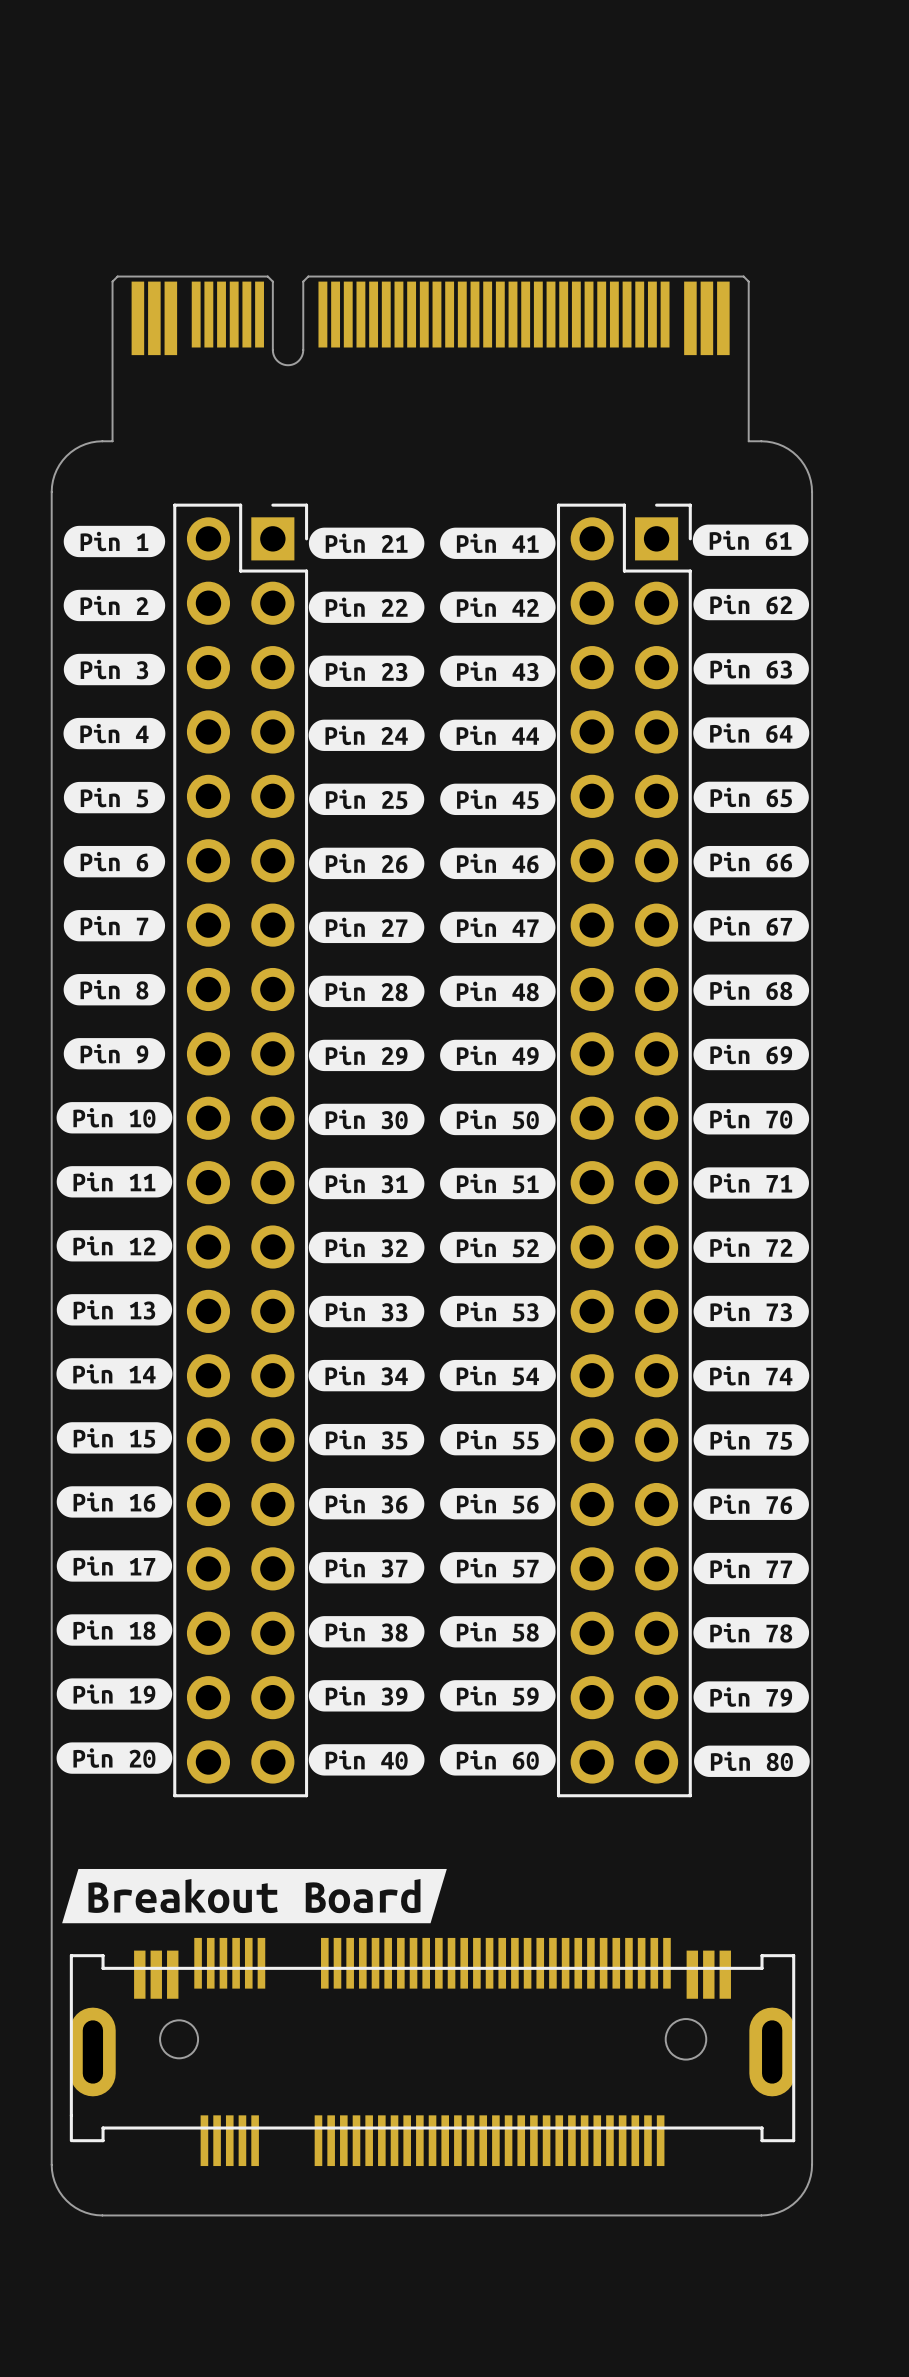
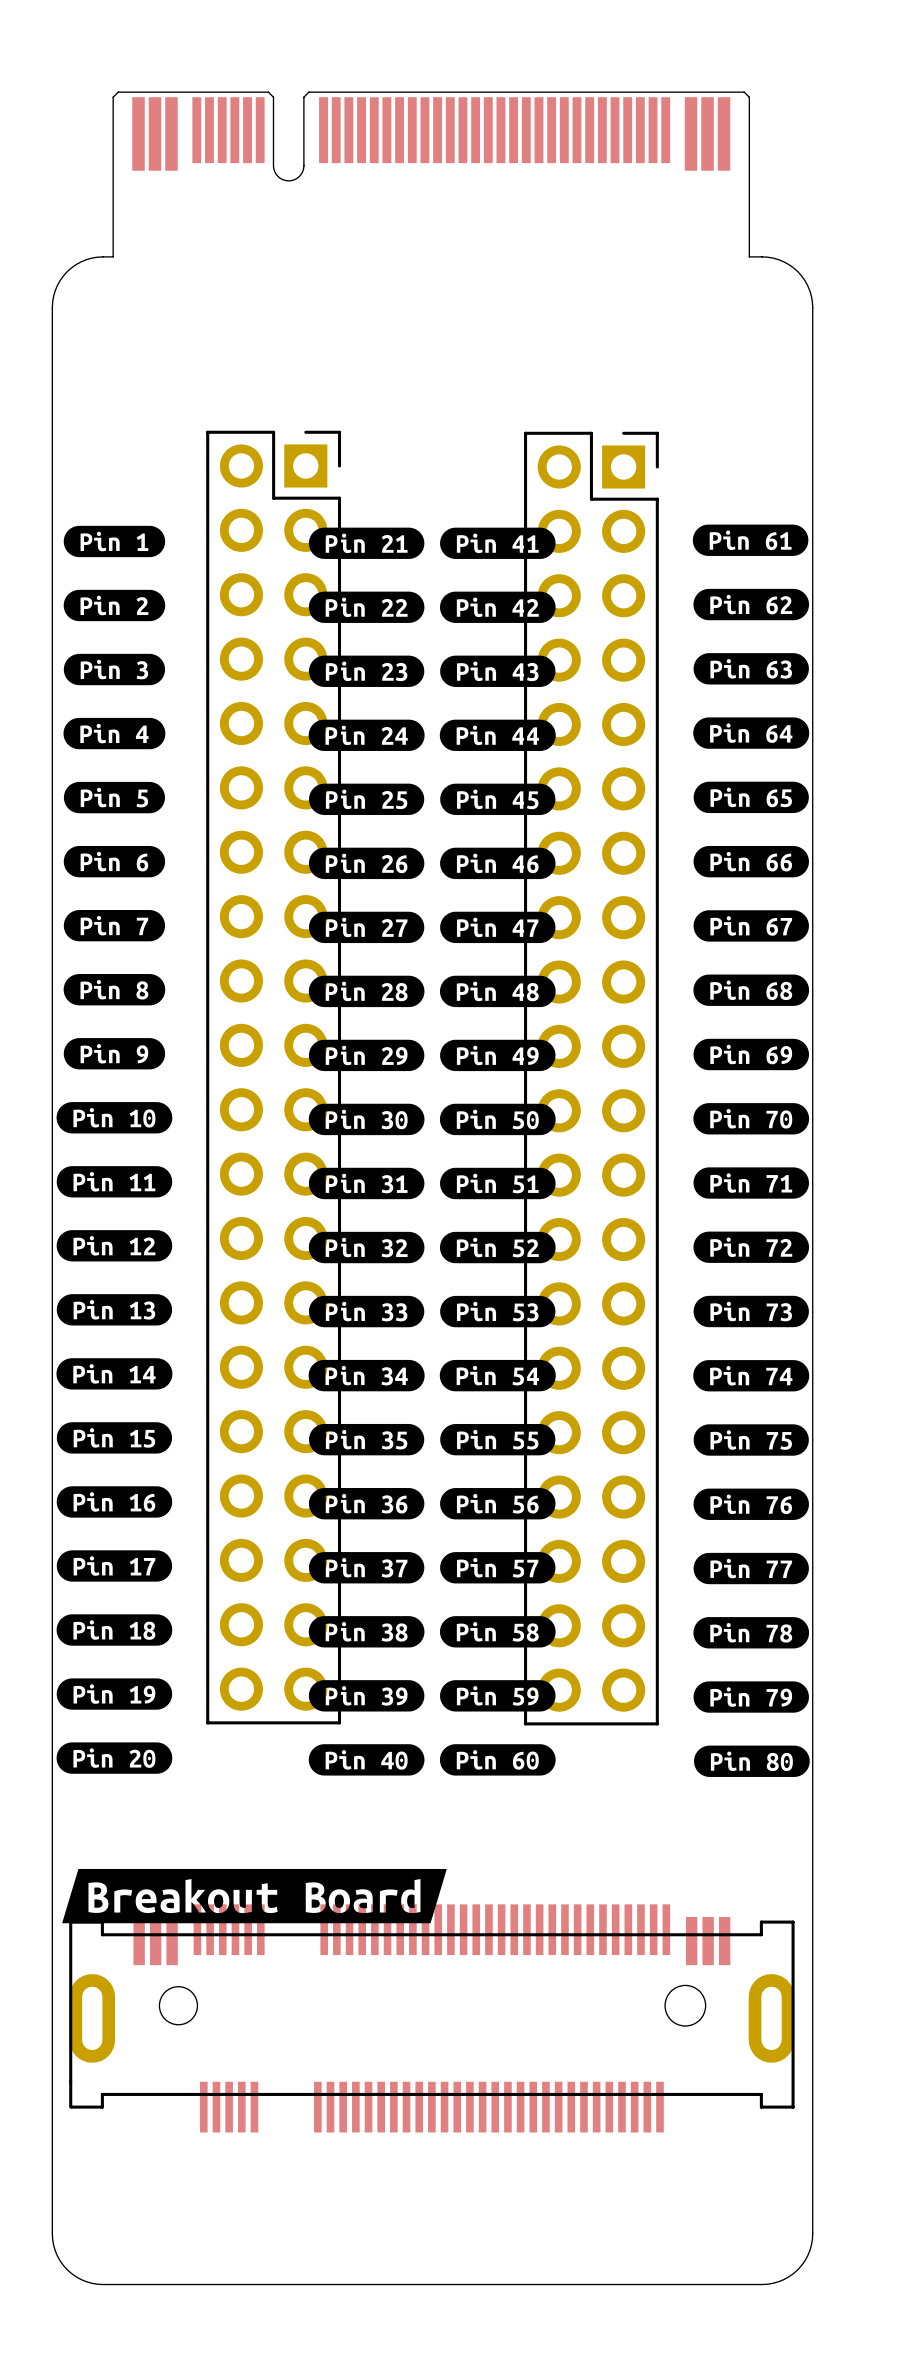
board edge: none -> (113, 256) (91, 258) (71, 267) (57, 285) (52, 307) (52, 2233) (55, 2250) (63, 2265) (76, 2276) (91, 2283) (103, 2284) (762, 2284) (784, 2279) (797, 2269) (807, 2255) (812, 2233) (812, 307) (807, 285) (793, 267) (773, 258) (749, 256)
part position: (430, 358) -> (431, 174)
board edge: (112, 441) (91, 442) (70, 452) (56, 469) (51, 491) (51, 2164) (54, 2181) (62, 2196) (75, 2207) (85, 2212) (102, 2215) (761, 2215) (778, 2212) (797, 2200) (809, 2181) (812, 2164) (812, 491) (807, 469) (792, 452) (772, 442) (748, 441) -> none
part position: (240, 1150) -> (273, 1077)
part position: (624, 1150) -> (591, 1078)
part position: (432, 2051) -> (431, 2018)

